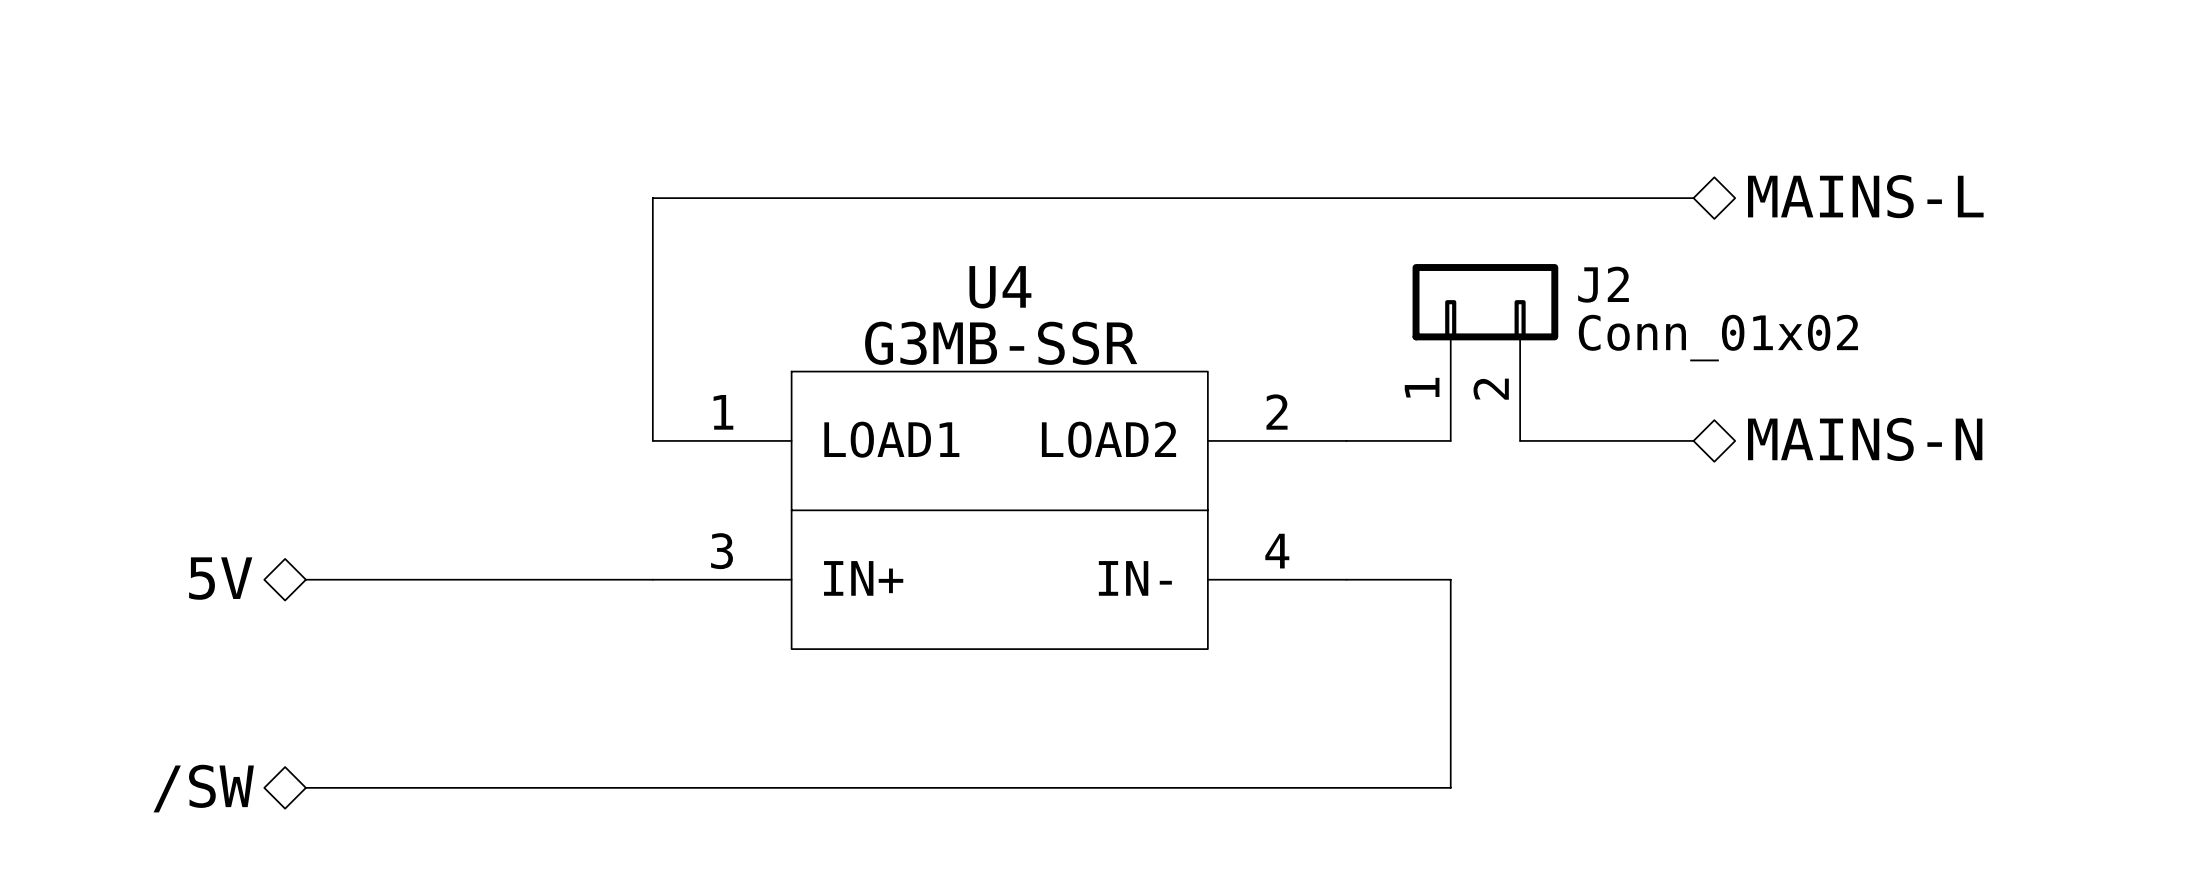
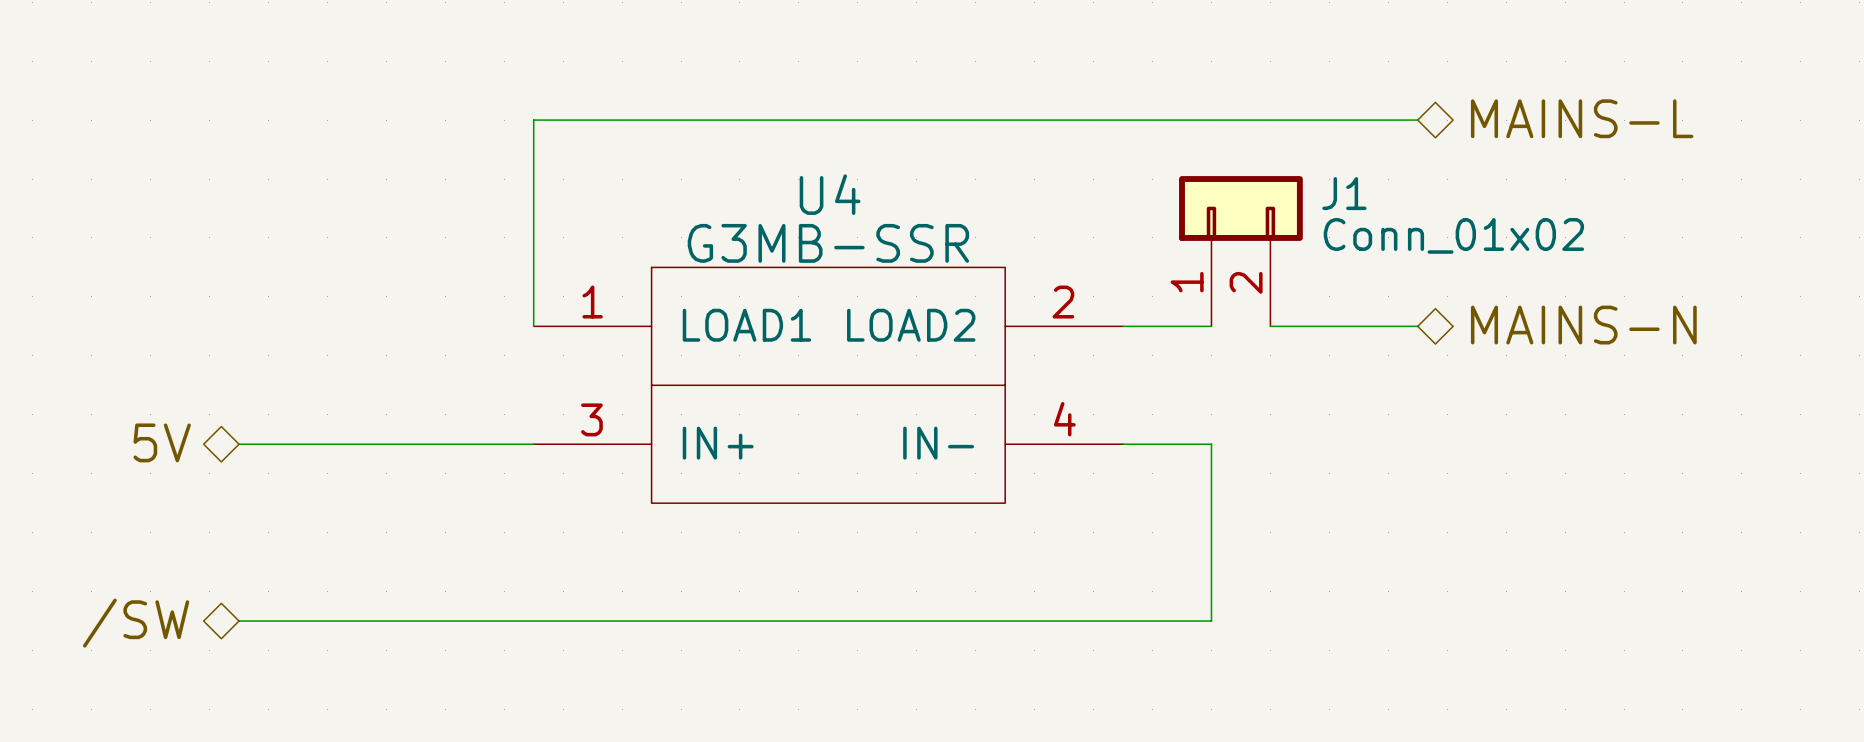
J2 name: J2 (1603, 284) -> J1 (1344, 193)

